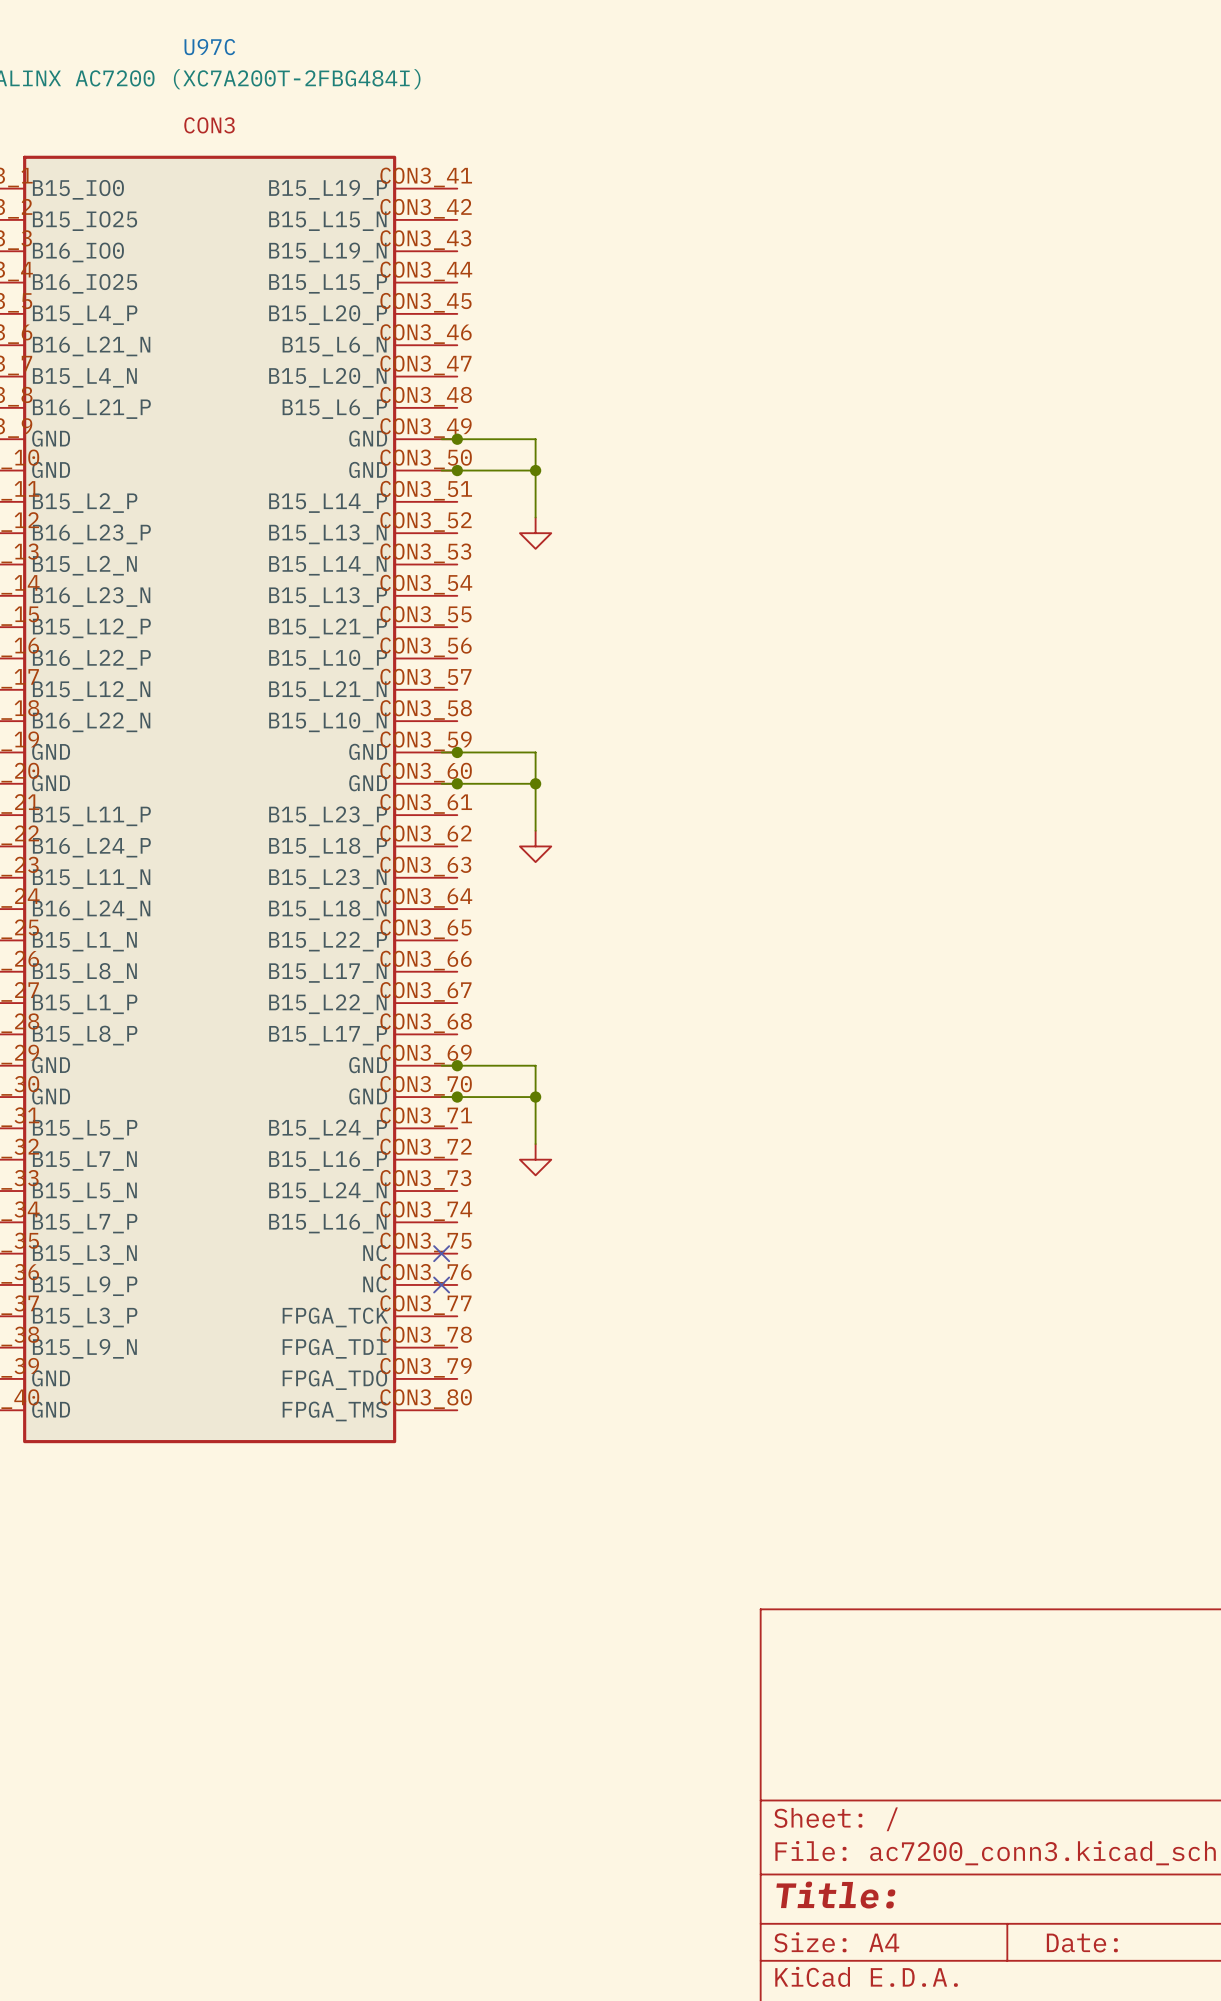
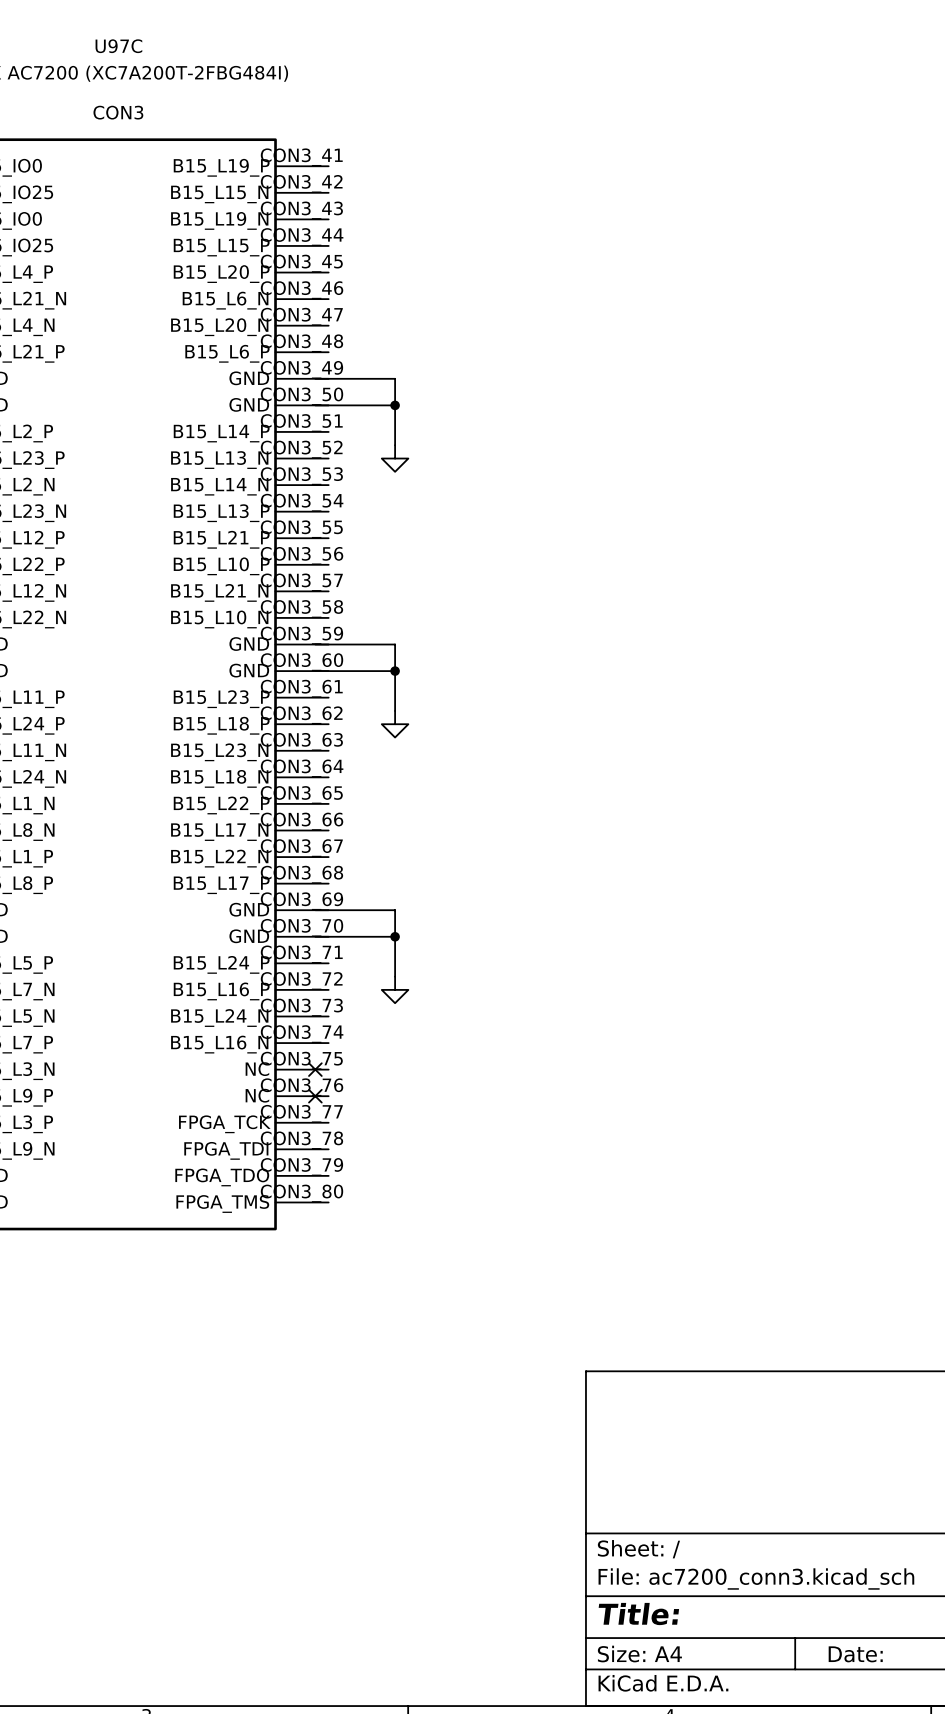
junction: (457, 439) -> none
junction: (457, 470) -> none
junction: (457, 752) -> none
junction: (457, 783) -> none
junction: (457, 1065) -> none
junction: (457, 1097) -> none

